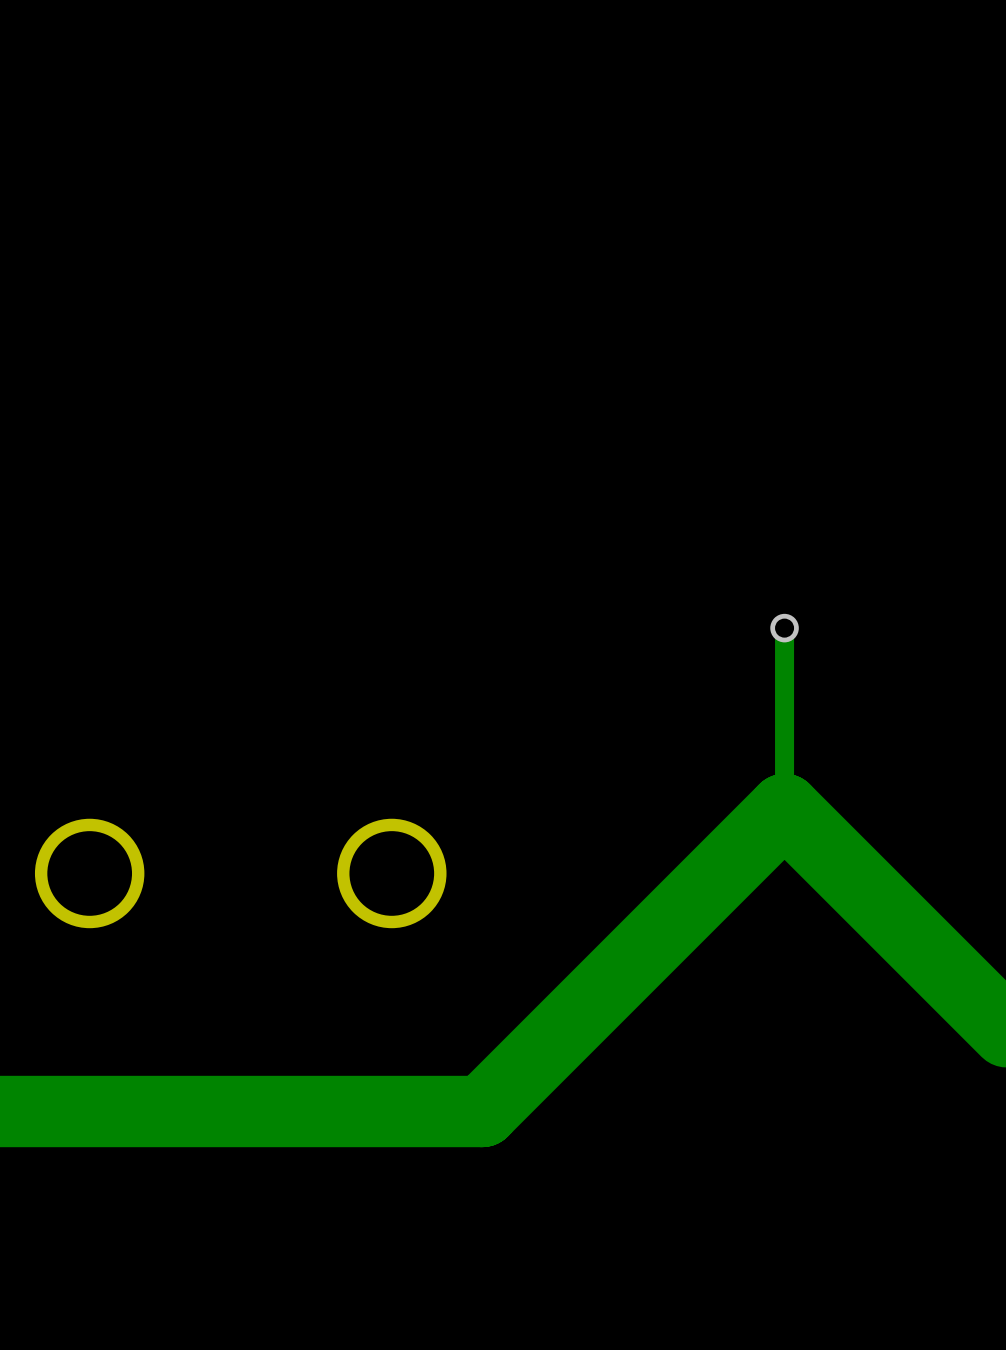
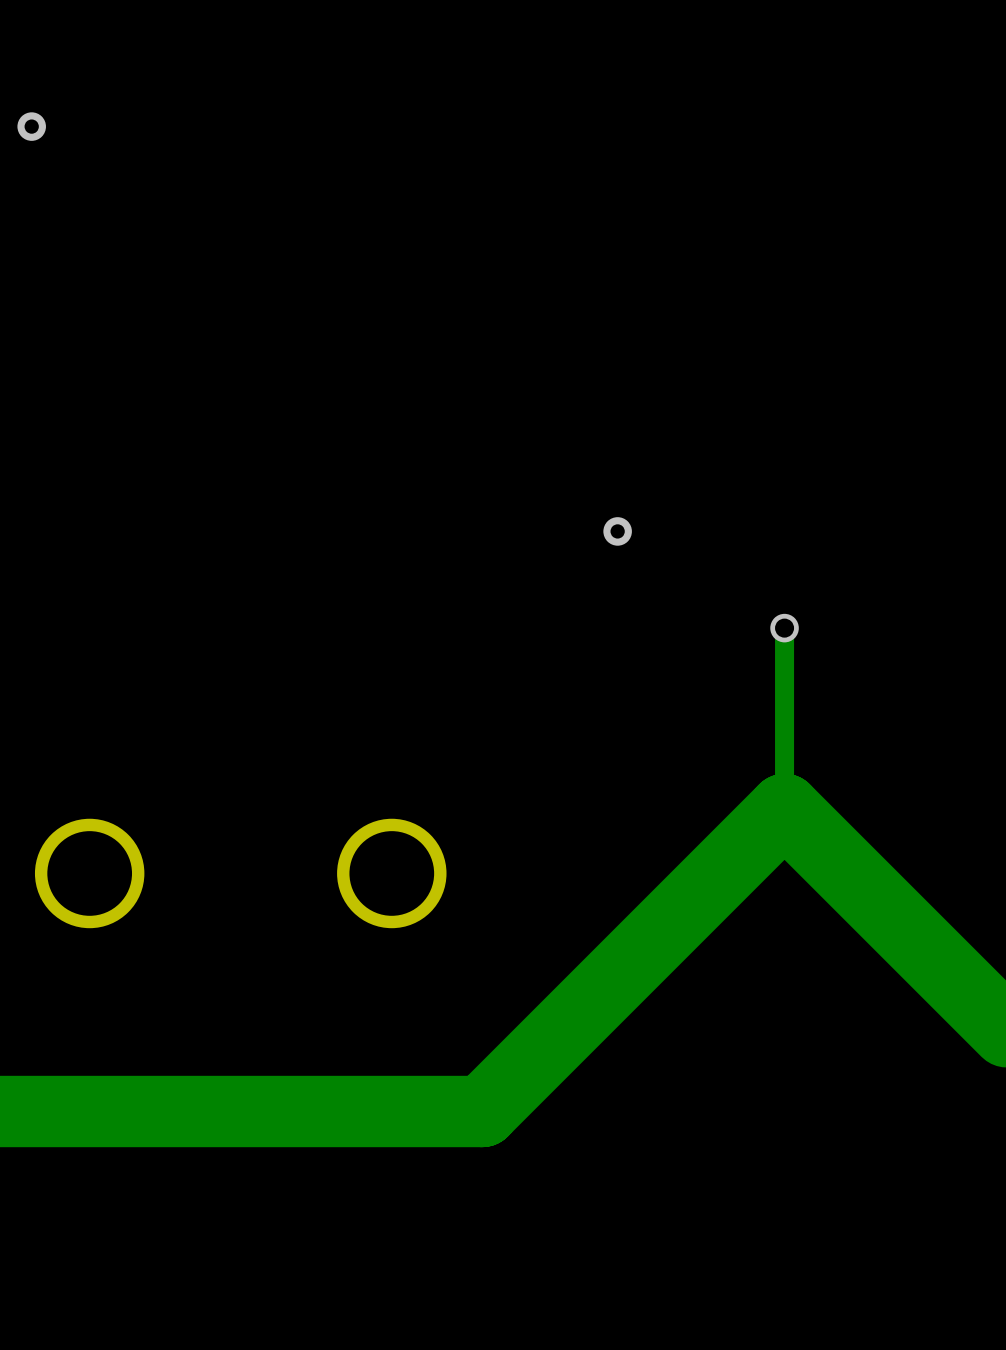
via: none -> (31, 126)
via: none -> (617, 531)

